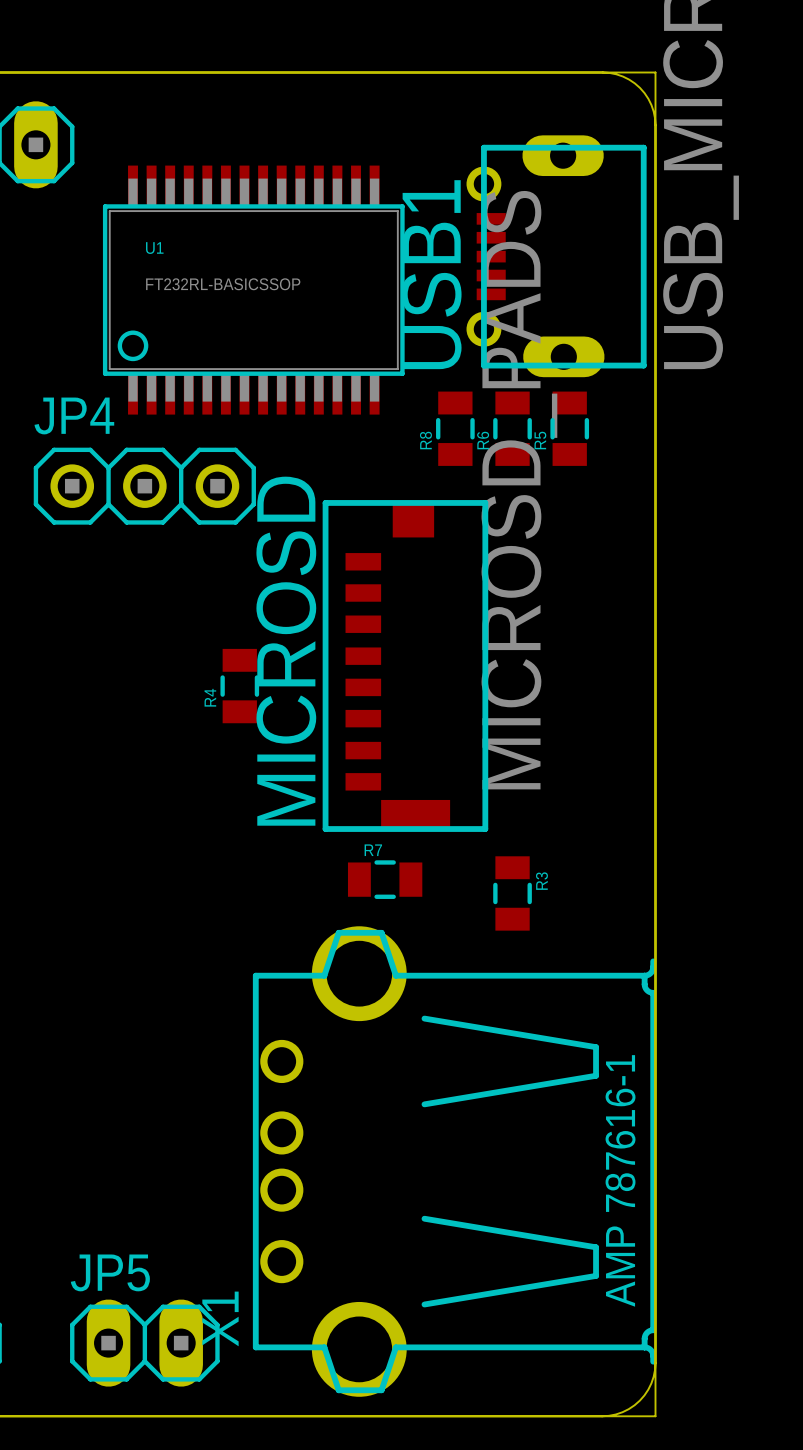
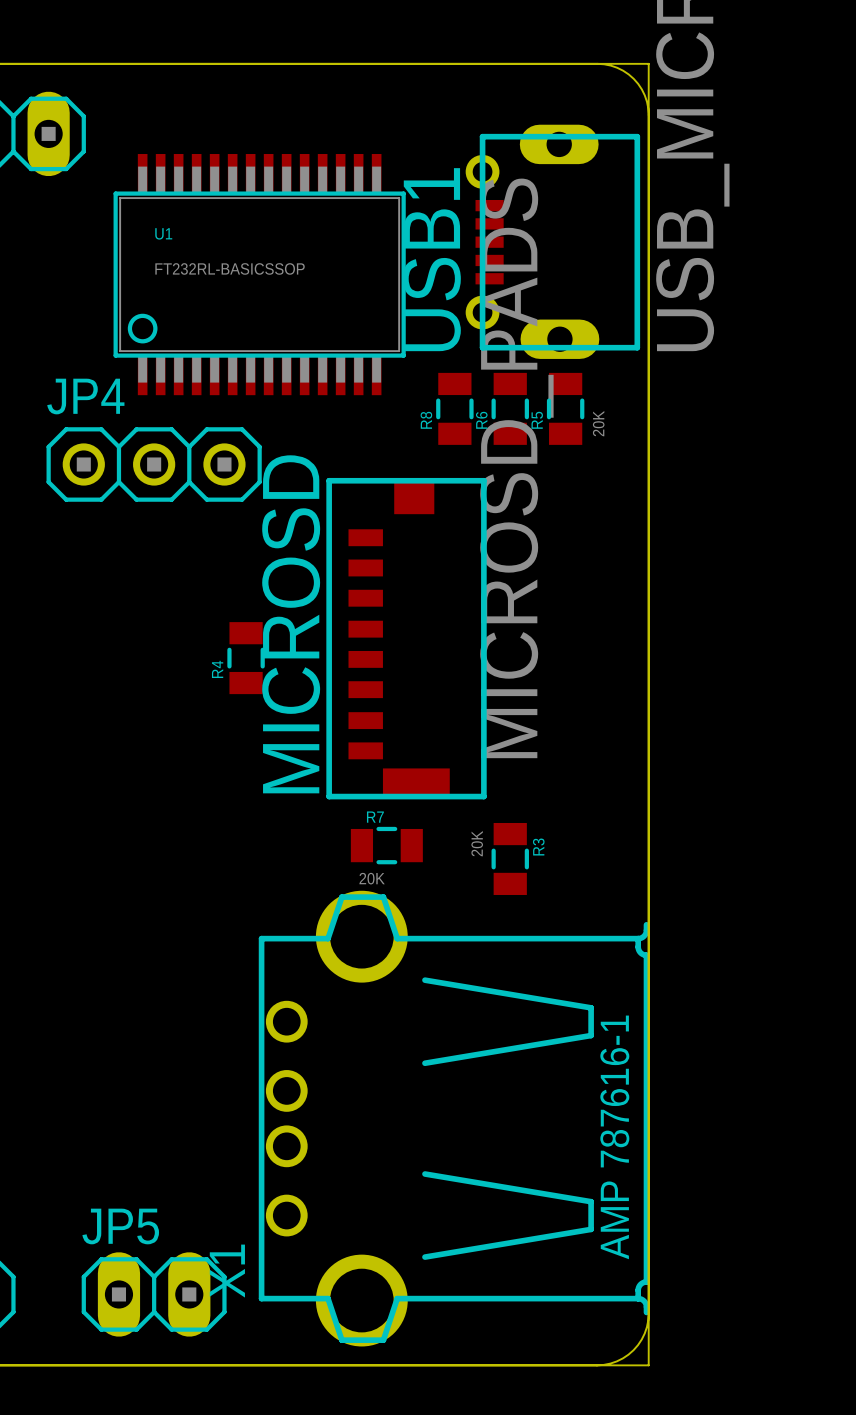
R5 value: none -> 20K (598, 423)
R3 value: none -> 20K (477, 843)
R7 value: none -> 20K (372, 878)

